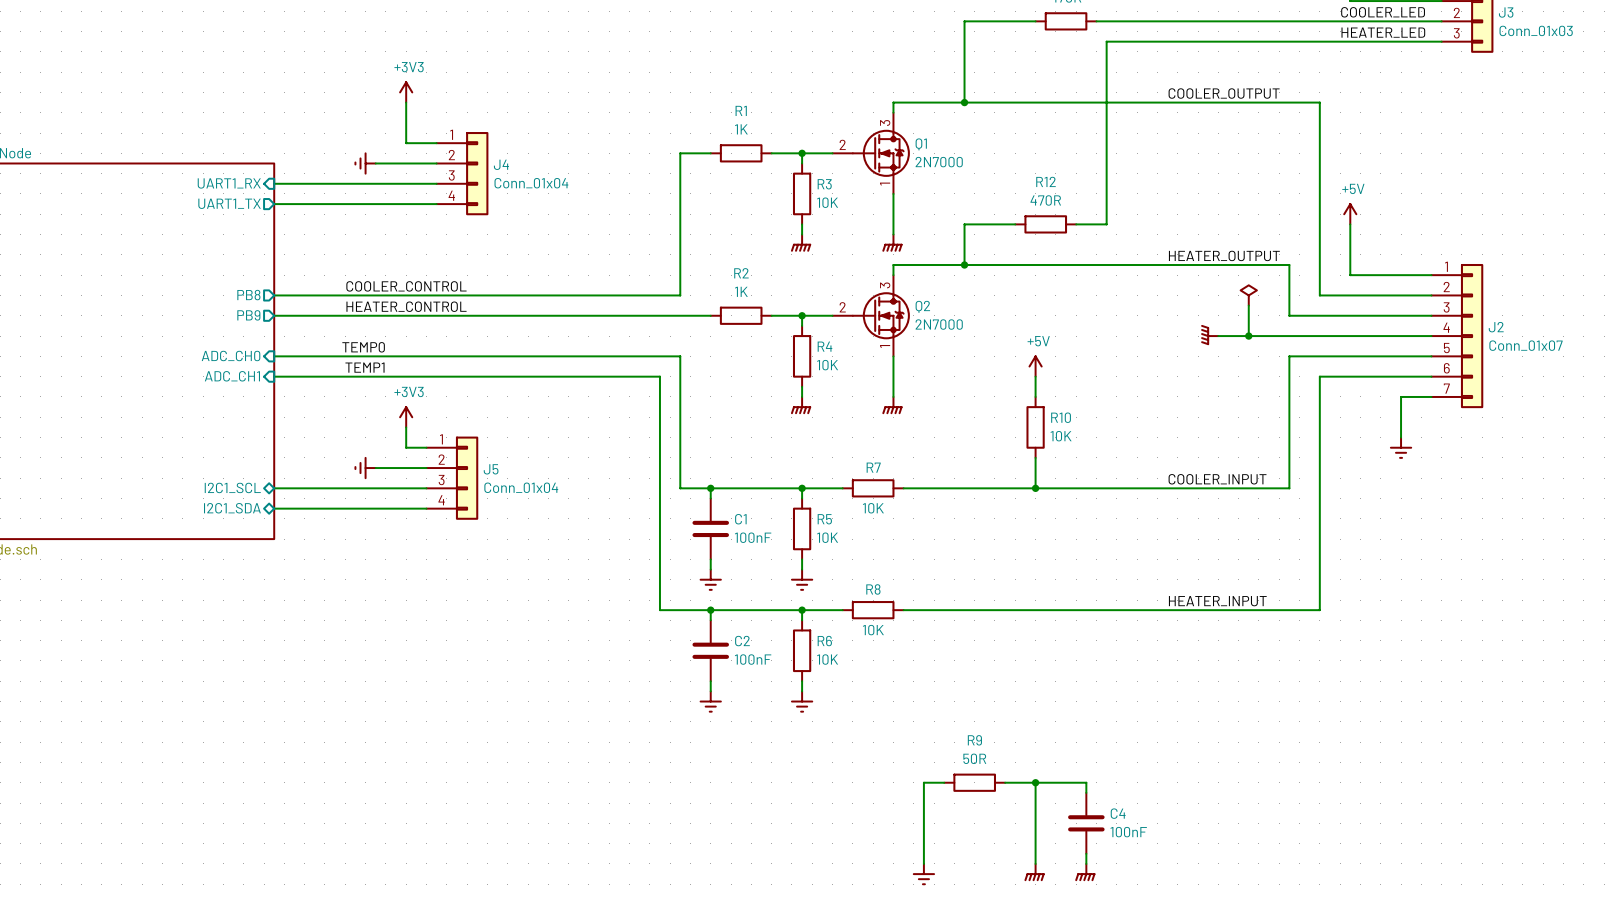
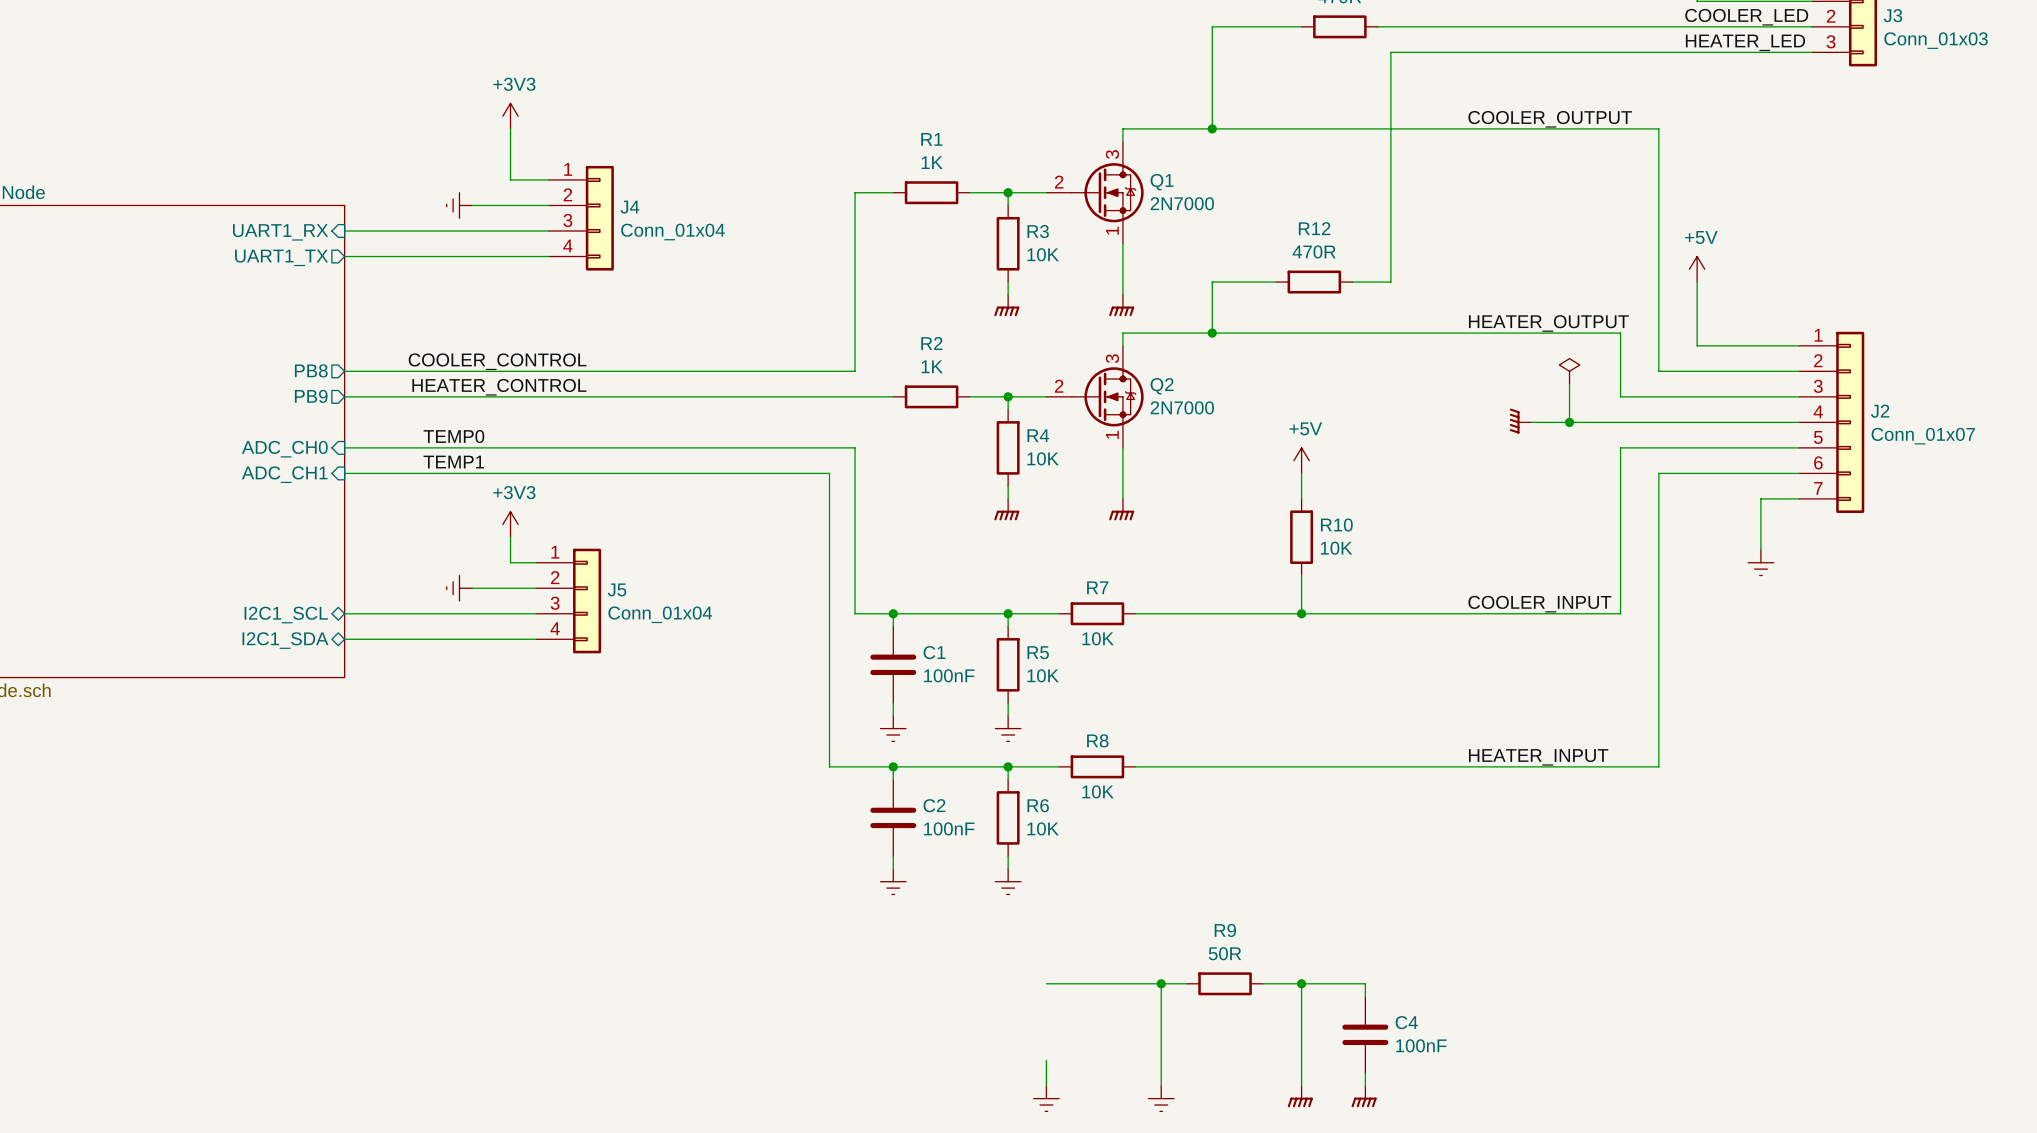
wire: none -> (1046, 983) (1161, 983)
junction: none -> (1161, 983)
wire: none -> (1046, 1060) (1046, 1085)
power symbol: none -> (1046, 1098)

